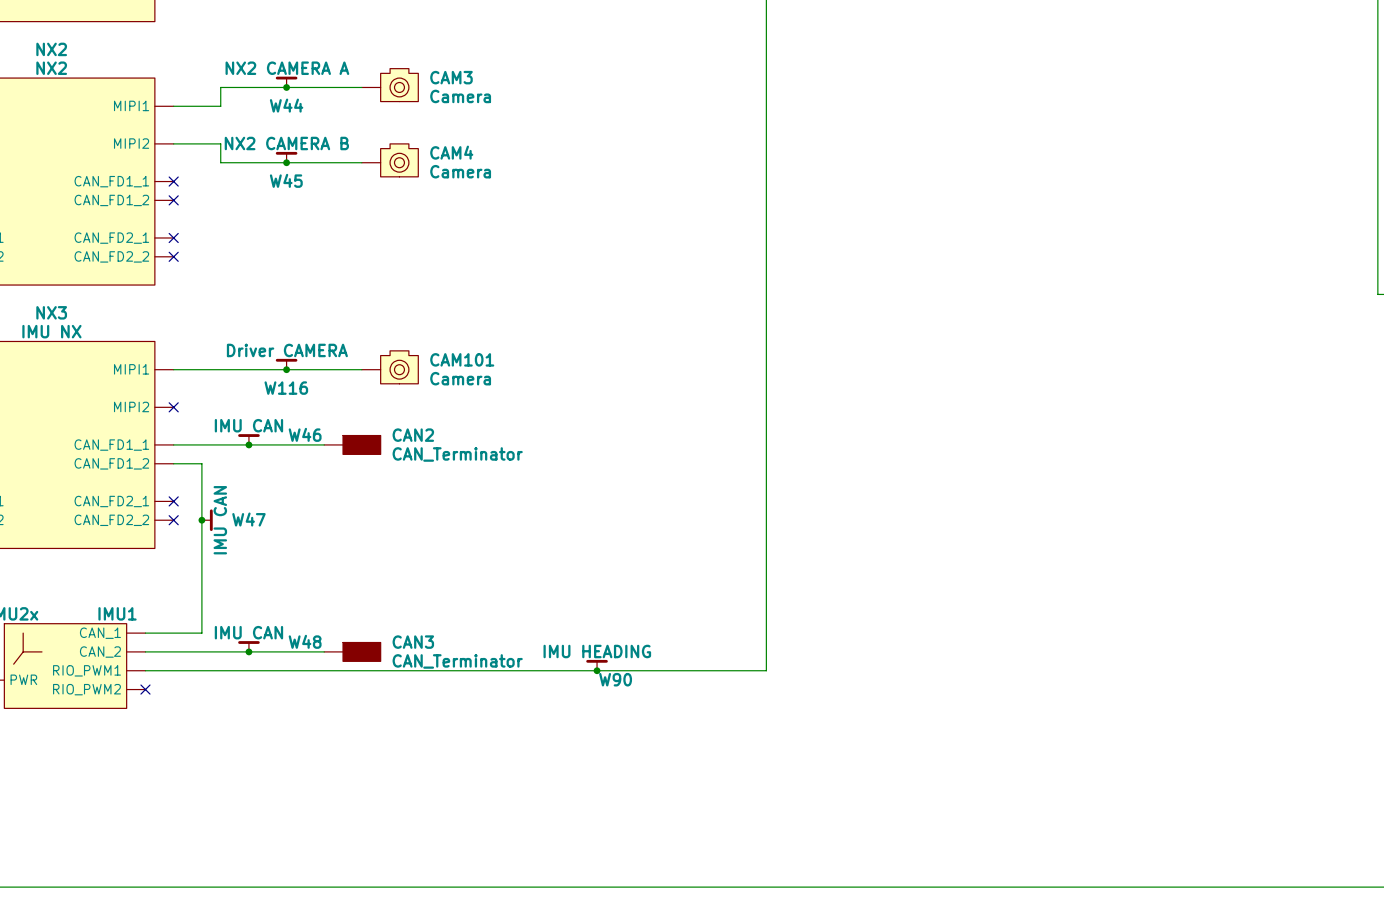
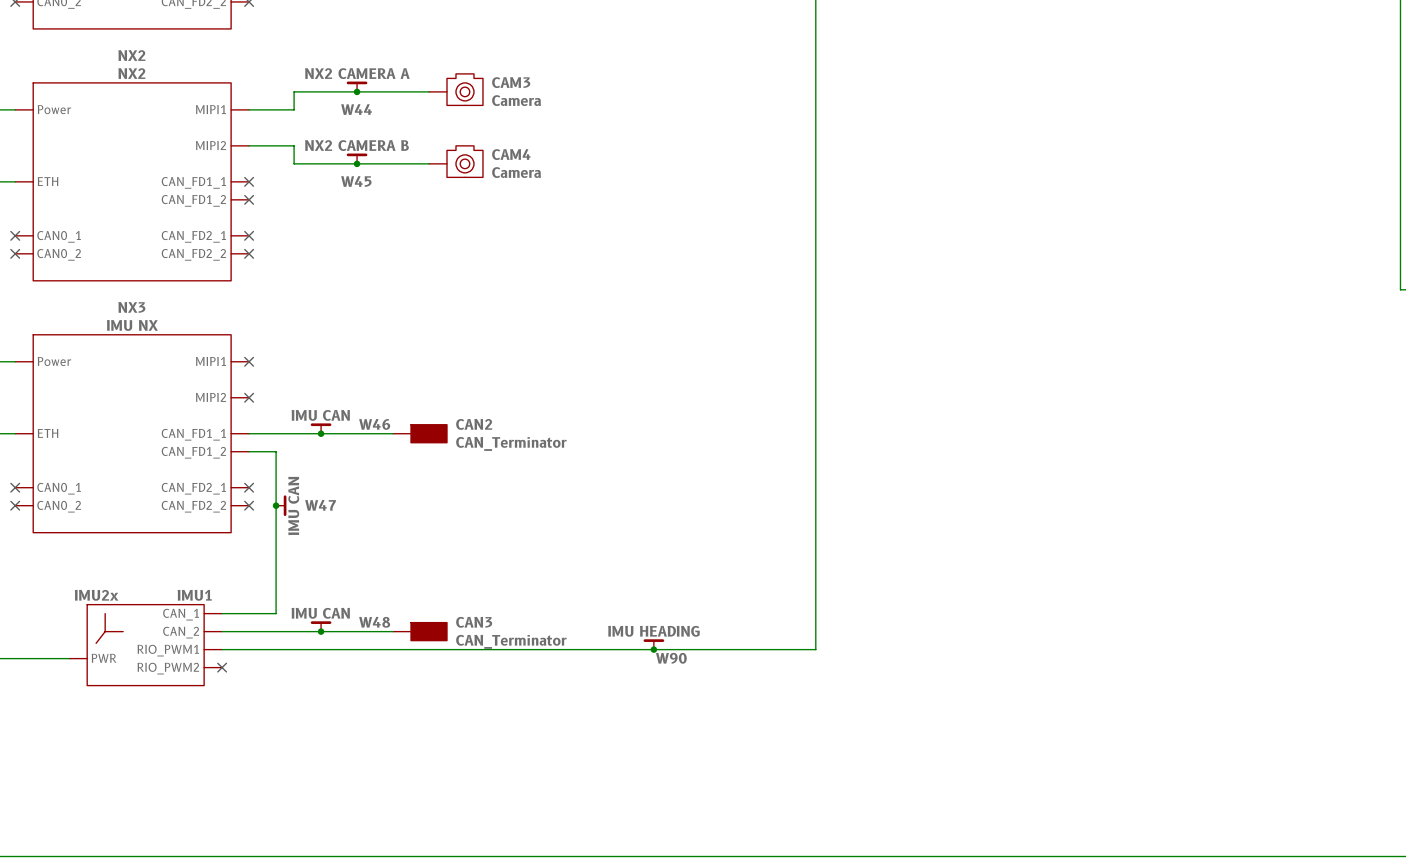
W116: Driver CAMERA (286, 364) -> none
CAM101: Camera (390, 367) -> none
wire: (173, 369) (361, 369) -> none
no-connect mark: none -> (249, 361)
junction: (286, 369) -> none

